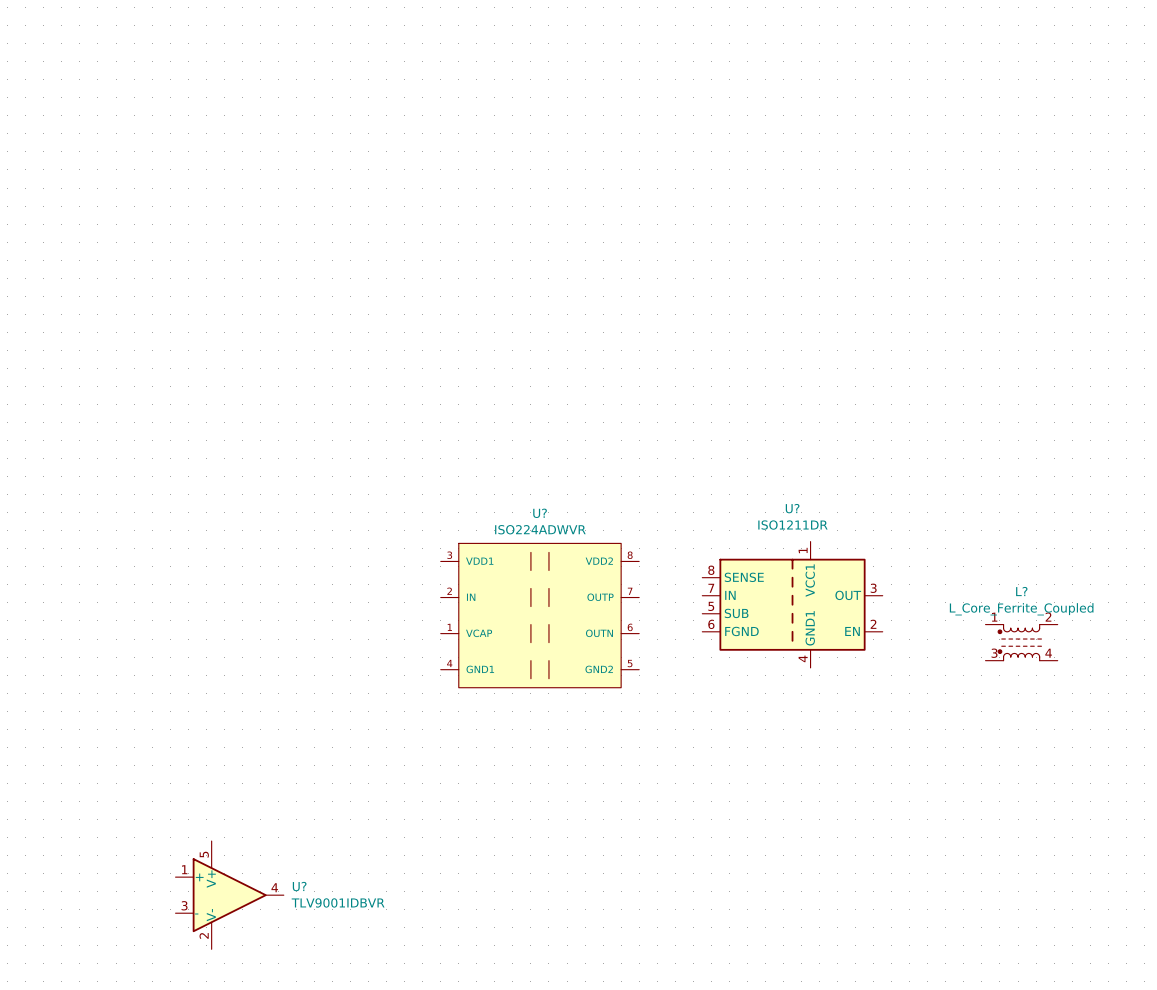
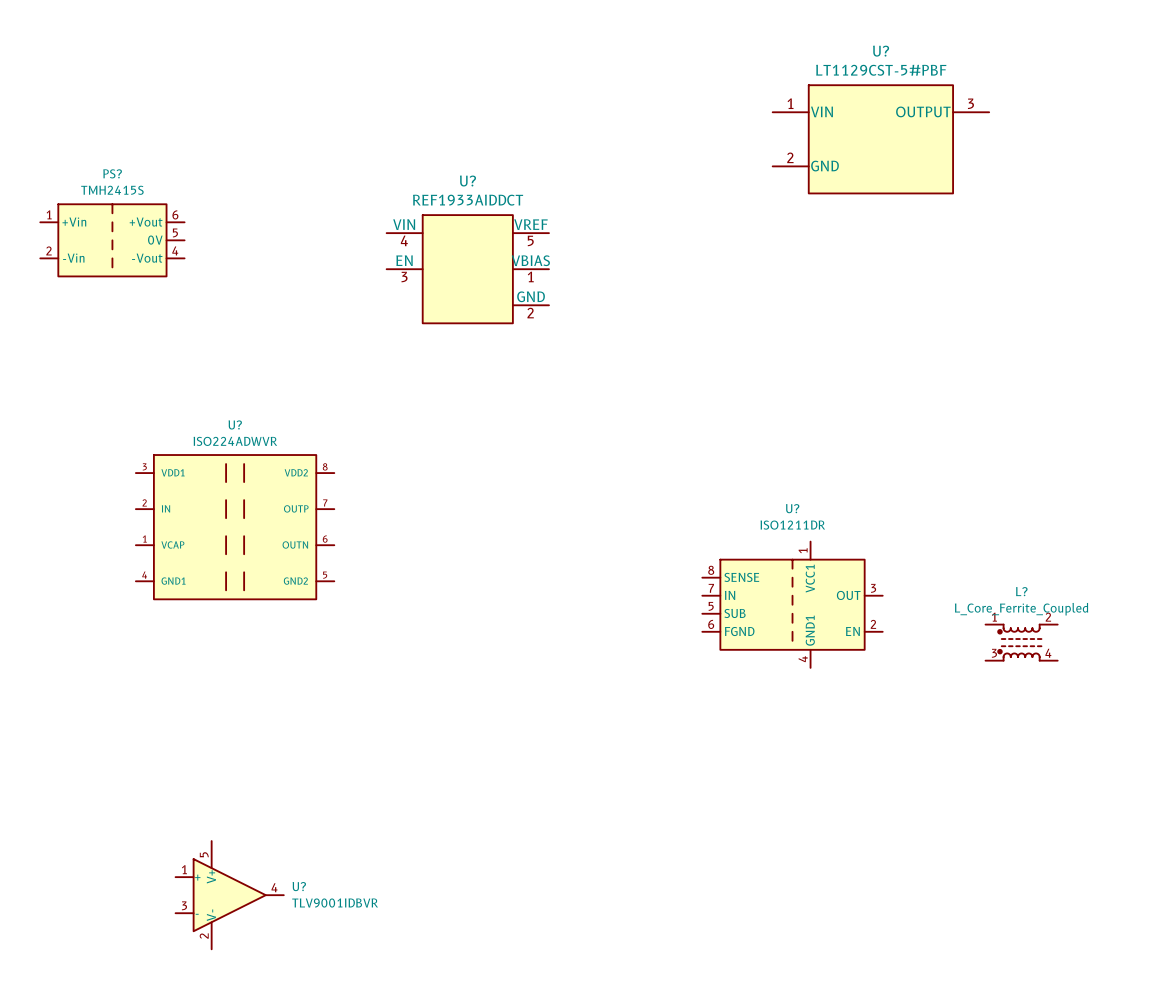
U?: none -> LT1129CST-5#PBF (880, 139)
PS?: none -> TMH2415S (112, 240)
U?: none -> REF1933AIDDCT (467, 269)
U?: none -> ISO224ADWVR (235, 527)
U?: ISO224ADWVR (539, 615) -> none

